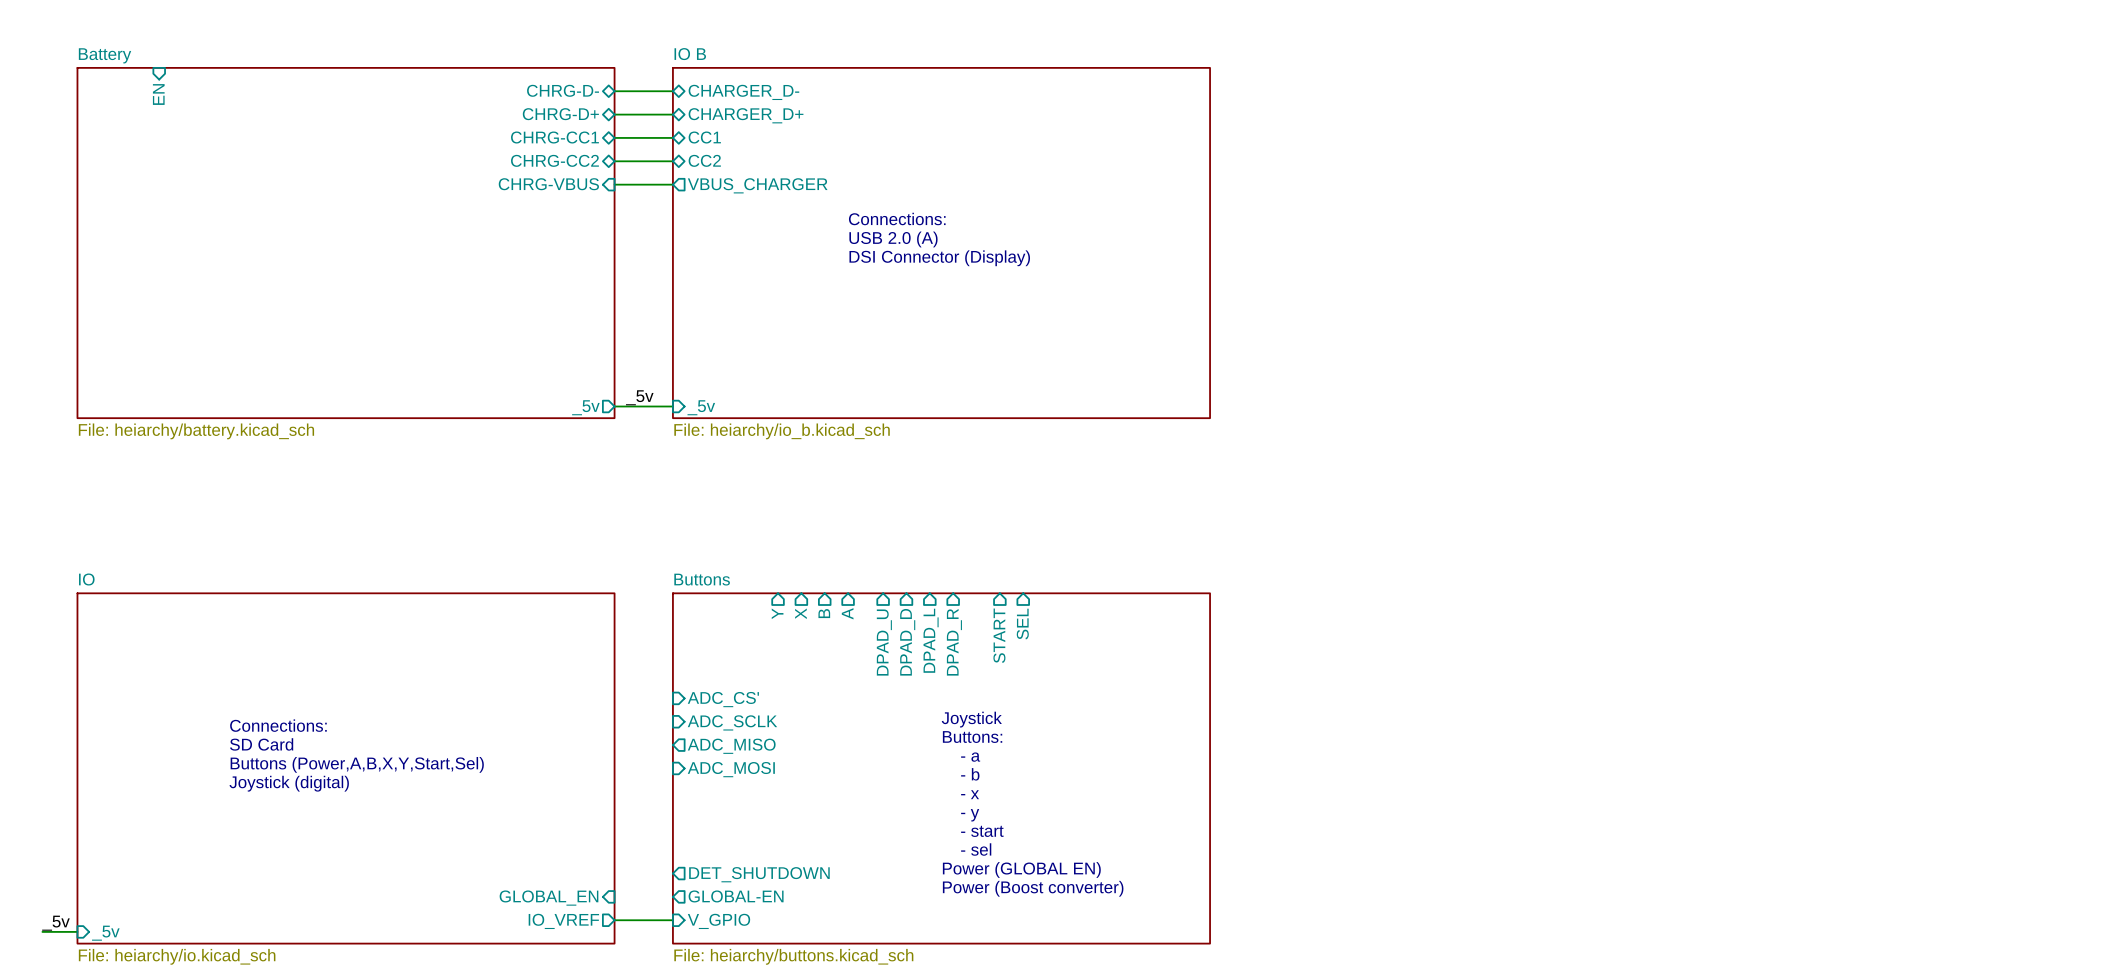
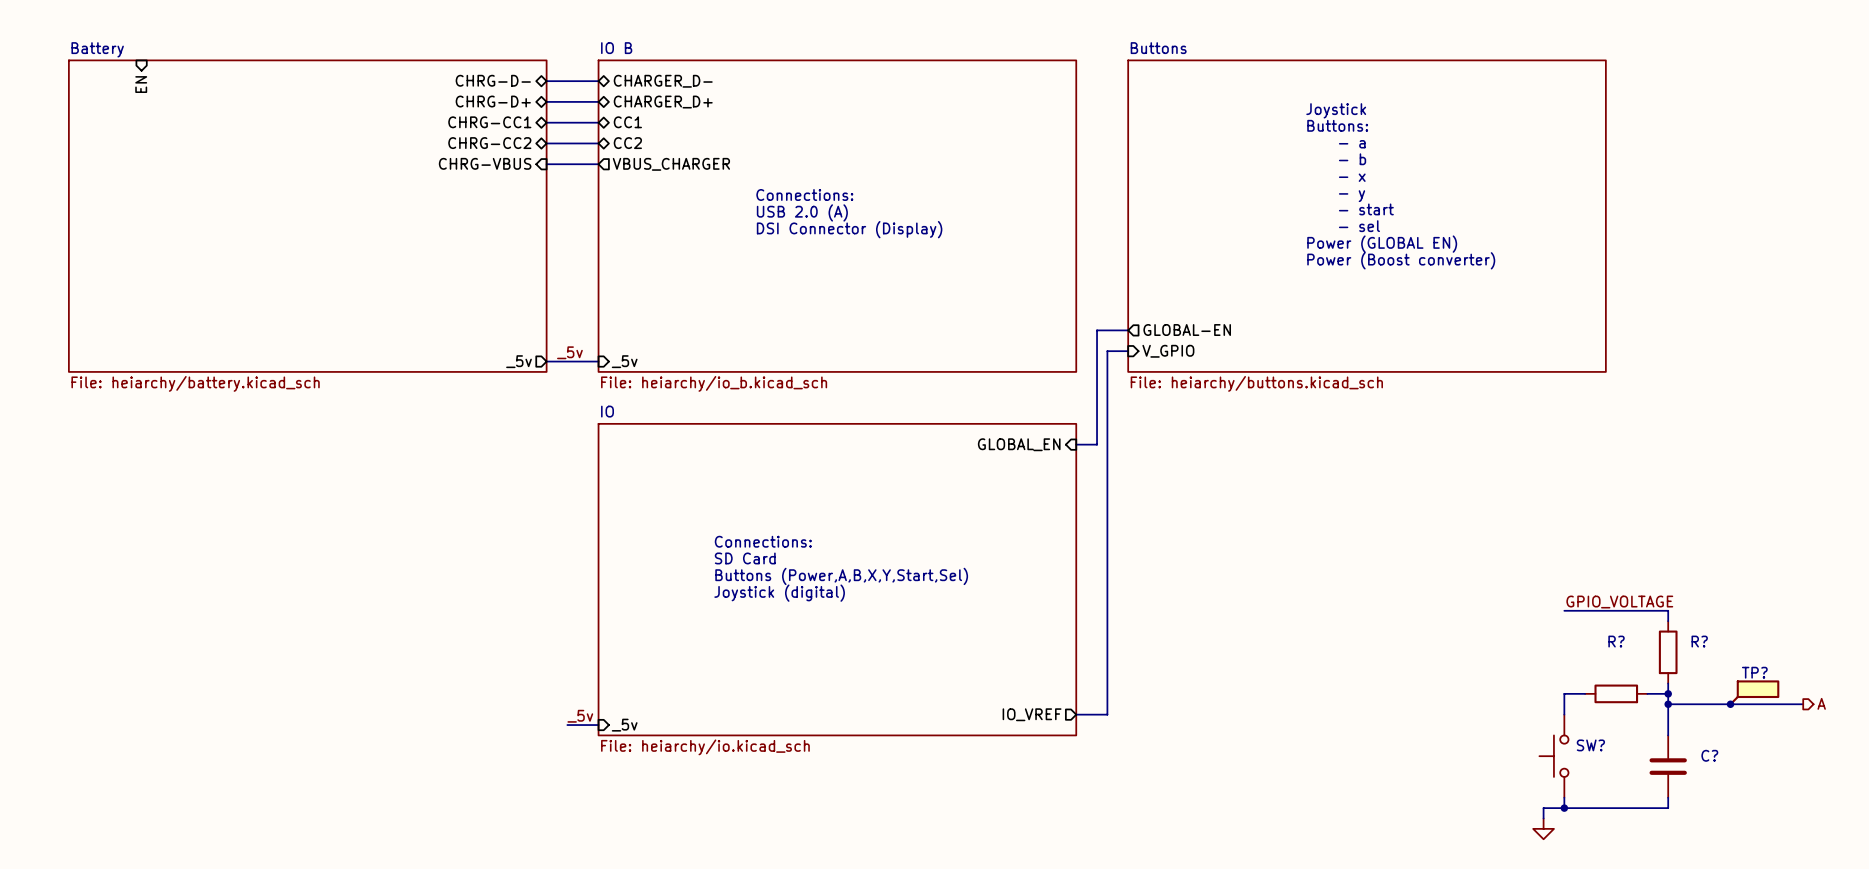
text: none -> Joystick (1336, 110)
text: none -> Buttons: (1337, 125)
text: none -> - a (1352, 144)
text: none -> - b (1352, 159)
text: none -> - x (1352, 177)
text: none -> - y (1352, 196)
text: none -> - start (1366, 209)
sheet Buttons: none -> File: heiarchy/buttons.kicad_sch (1367, 216)
text: none -> - sel (1359, 226)
text: none -> Power (GLOBAL EN) (1382, 244)
text: none -> Power (Boost converter) (1401, 260)
wire: none -> (1128, 330) (1097, 330) (1097, 444) (1076, 444)
sheet pin: none -> GLOBAL-EN (1187, 330)
wire: none -> (1128, 351) (1107, 351) (1107, 714) (1076, 714)
sheet pin: none -> V_GPIO (1168, 351)
sheet pin: none -> GLOBAL_EN (1019, 444)
text: none -> Connections: (763, 541)
sheet pin: Y (777, 613) -> none
sheet pin: X (800, 613) -> none
sheet pin: B (824, 613) -> none
sheet pin: A (847, 613) -> none
sheet pin: SEL (1022, 624) -> none
text: none -> SD Card (745, 558)
sheet pin: START (999, 635) -> none
sheet pin: DPAD_L (931, 640) -> none
sheet pin: DPAD_U (884, 642) -> none
sheet pin: DPAD_D (907, 642) -> none
sheet pin: DPAD_R (954, 642) -> none
text: none -> Buttons (Power,A,B,X,Y,Start,Sel) (841, 576)
sheet IO: none -> File: heiarchy/io.kicad_sch (837, 579)
text: none -> Joystick (digital) (779, 593)
label: none -> GPIO_VOLTAGE (1619, 602)
wire: none -> (1564, 610) (1668, 610) (1668, 621)
sheet pin: ADC_CS' (723, 699) -> none
text: Joystick (971, 719) -> none
sheet pin: ADC_SCLK (732, 722) -> none
text: Connections: (278, 725) -> none
R?: none -> (1668, 652)
text: Buttons: (972, 737) -> none
text: SD Card (261, 744) -> none
sheet pin: ADC_MISO (731, 746) -> none
text: - a (970, 757) -> none
text: Buttons (Power,A,B,X,Y,Start,Sel) (357, 764) -> none
sheet IO: File: heiarchy/io.kicad_sch (346, 768) -> none
sheet Buttons: File: heiarchy/buttons.kicad_sch (941, 768) -> none
wire: none -> (1668, 683) (1668, 735)
sheet pin: ADC_MOSI (731, 769) -> none
text: - b (970, 774) -> none
TP?: none -> (1754, 692)
wire: none -> (1585, 693) (1564, 693) (1564, 714)
R?: none -> (1616, 693)
wire: none -> (1647, 693) (1668, 693)
junction: none -> (1668, 693)
text: Joystick (digital) (289, 783) -> none
wire: none -> (1668, 704) (1803, 704)
junction: none -> (1668, 704)
junction: none -> (1730, 704)
hierarchical label: none -> A (1821, 703)
text: - x (970, 794) -> none
sheet pin: none -> IO_VREF (1032, 714)
label: none -> _5v (580, 716)
wire: none -> (567, 725) (598, 725)
text: - y (970, 815) -> none
sheet pin: none -> _5v (624, 725)
text: - start (982, 831) -> none
text: - sel (976, 849) -> none
SW?: none -> (1553, 756)
C?: none -> (1668, 766)
text: Power (GLOBAL EN) (1021, 869) -> none
sheet pin: DET_SHUTDOWN (759, 874) -> none
text: Power (Boost converter) (1033, 888) -> none
sheet pin: GLOBAL-EN (736, 896) -> none
wire: none -> (1564, 797) (1564, 808)
wire: none -> (1668, 797) (1668, 808) (1543, 808) (1543, 818)
sheet pin: GLOBAL_EN (549, 898) -> none
junction: none -> (1564, 808)
wire: (614, 920) (672, 920) -> none
sheet pin: IO_VREF (563, 921) -> none
sheet pin: V_GPIO (719, 921) -> none
label: _5v (55, 923) -> none
wire: (42, 931) (77, 931) -> none
power symbol: none -> (1543, 828)
sheet pin: _5v (105, 933) -> none

